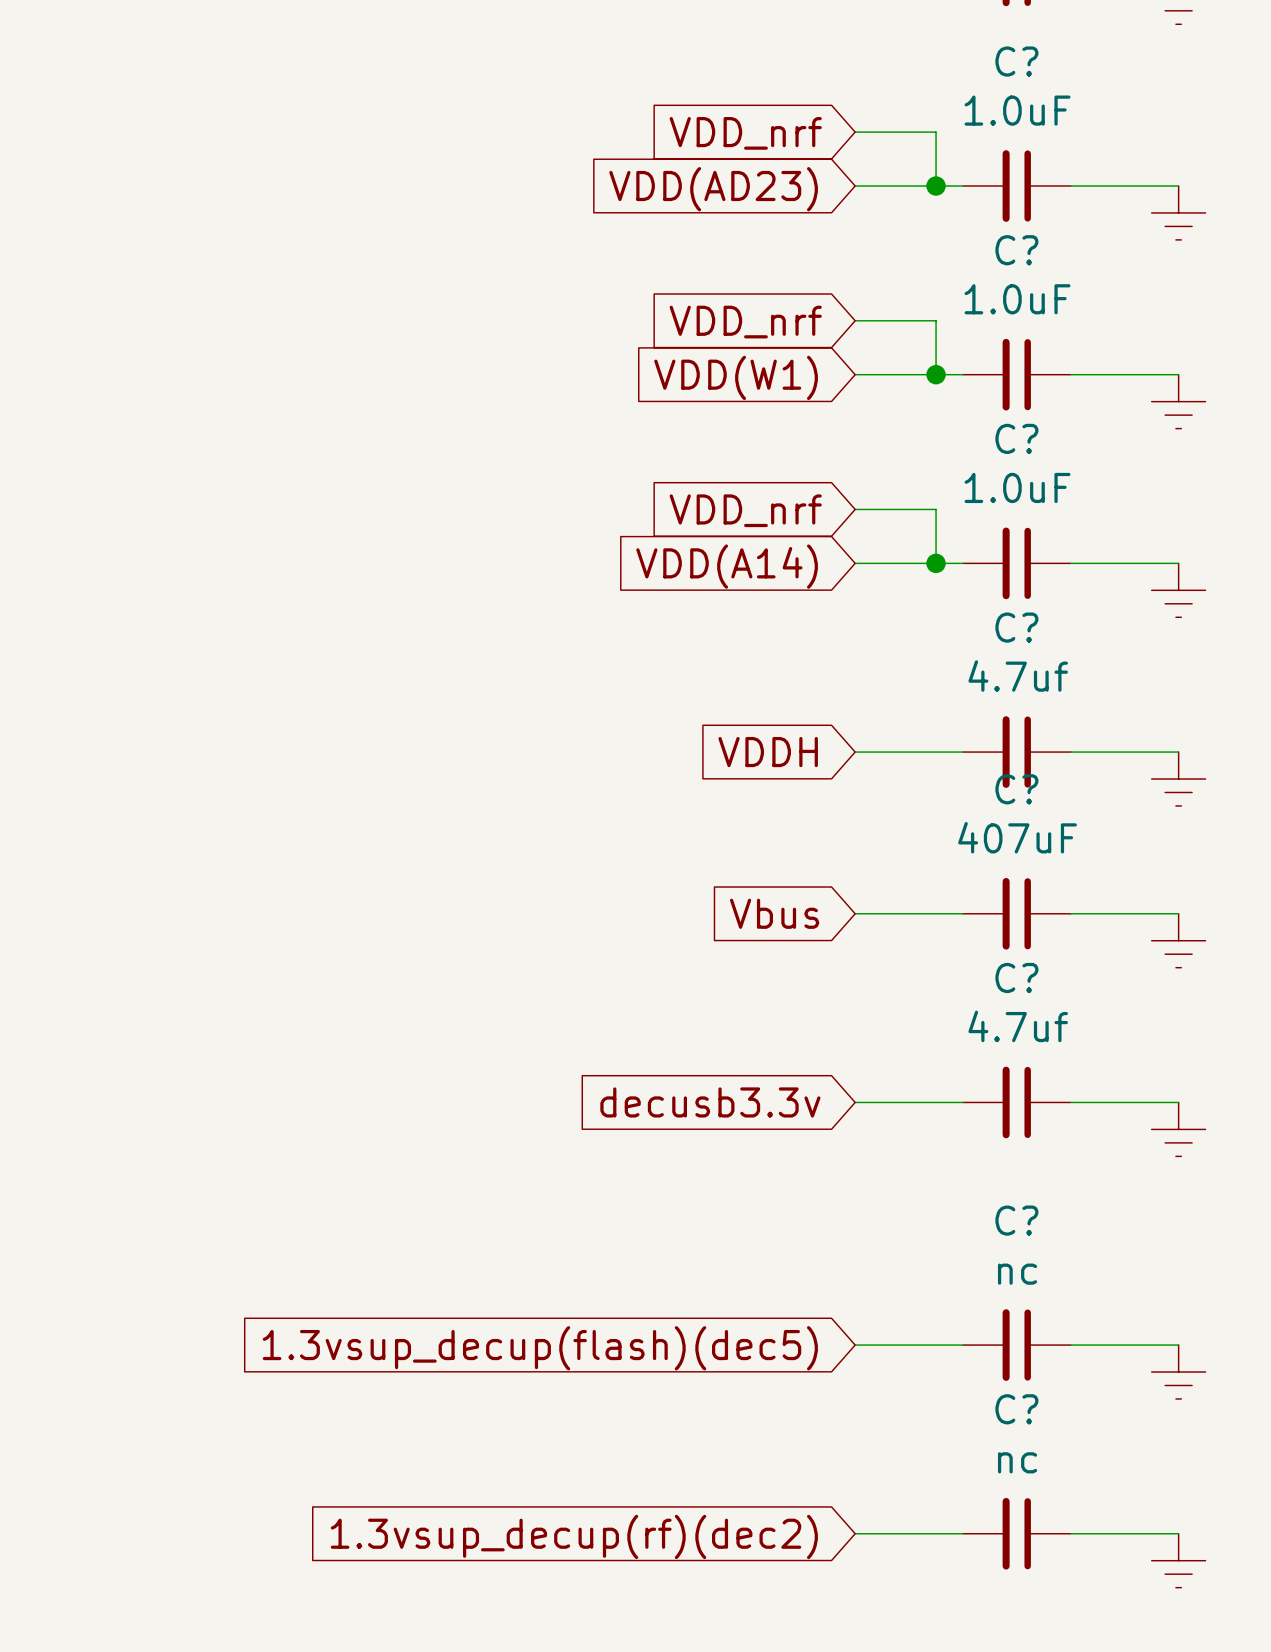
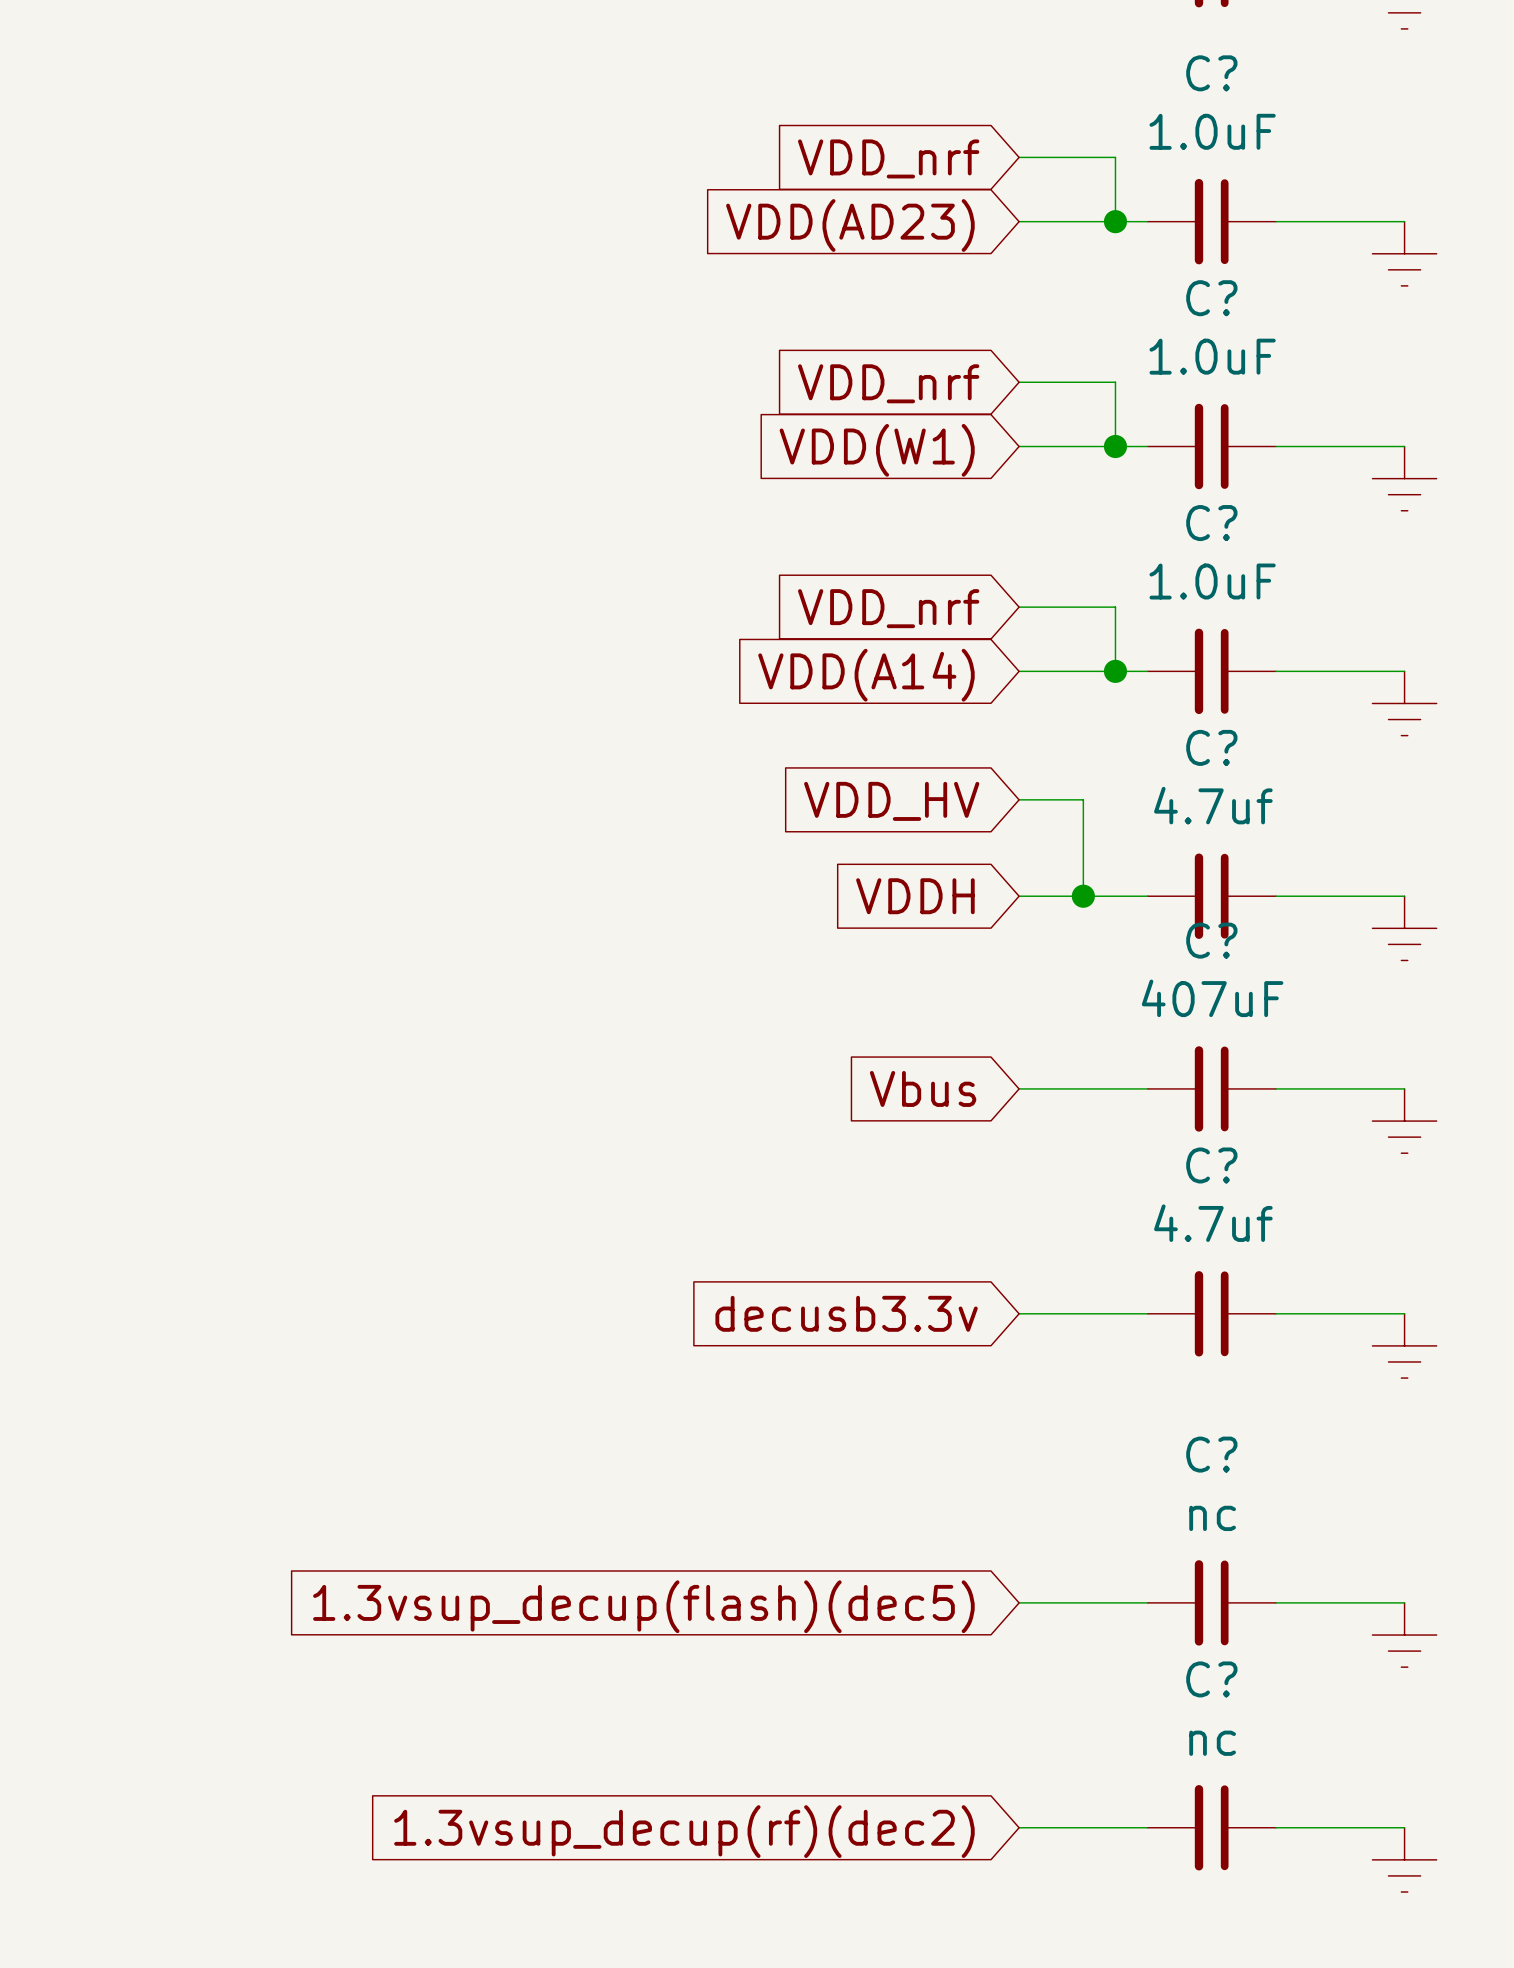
wire: none -> (1019, 799) (1083, 799) (1083, 896)
global label: none -> VDD_HV (891, 801)
junction: none -> (1083, 896)

